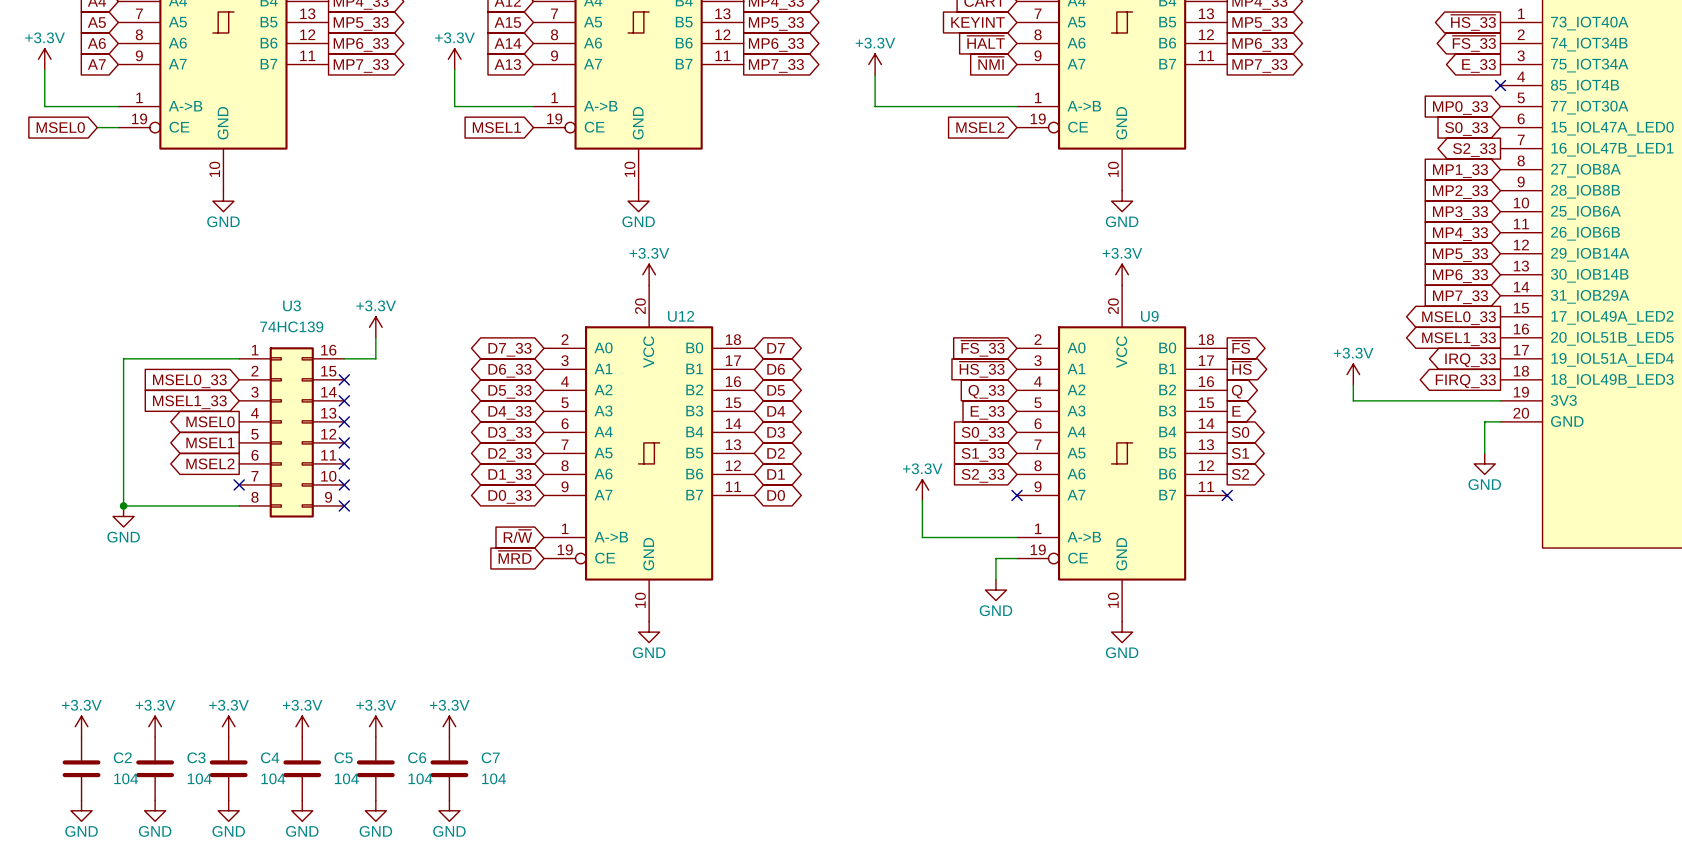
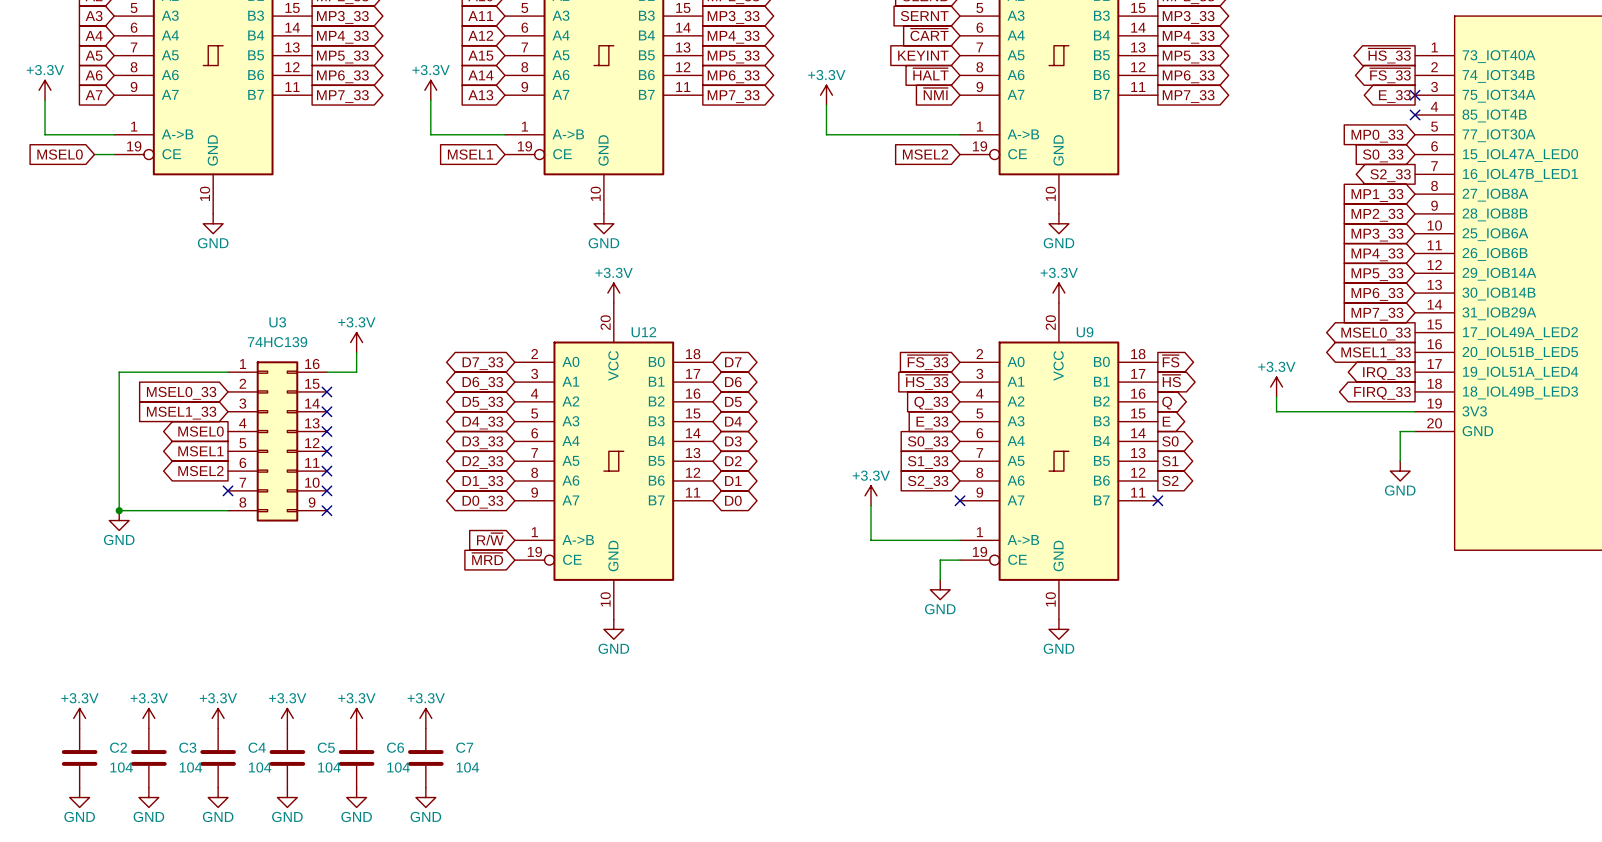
no-connect mark: none -> (1415, 95)

